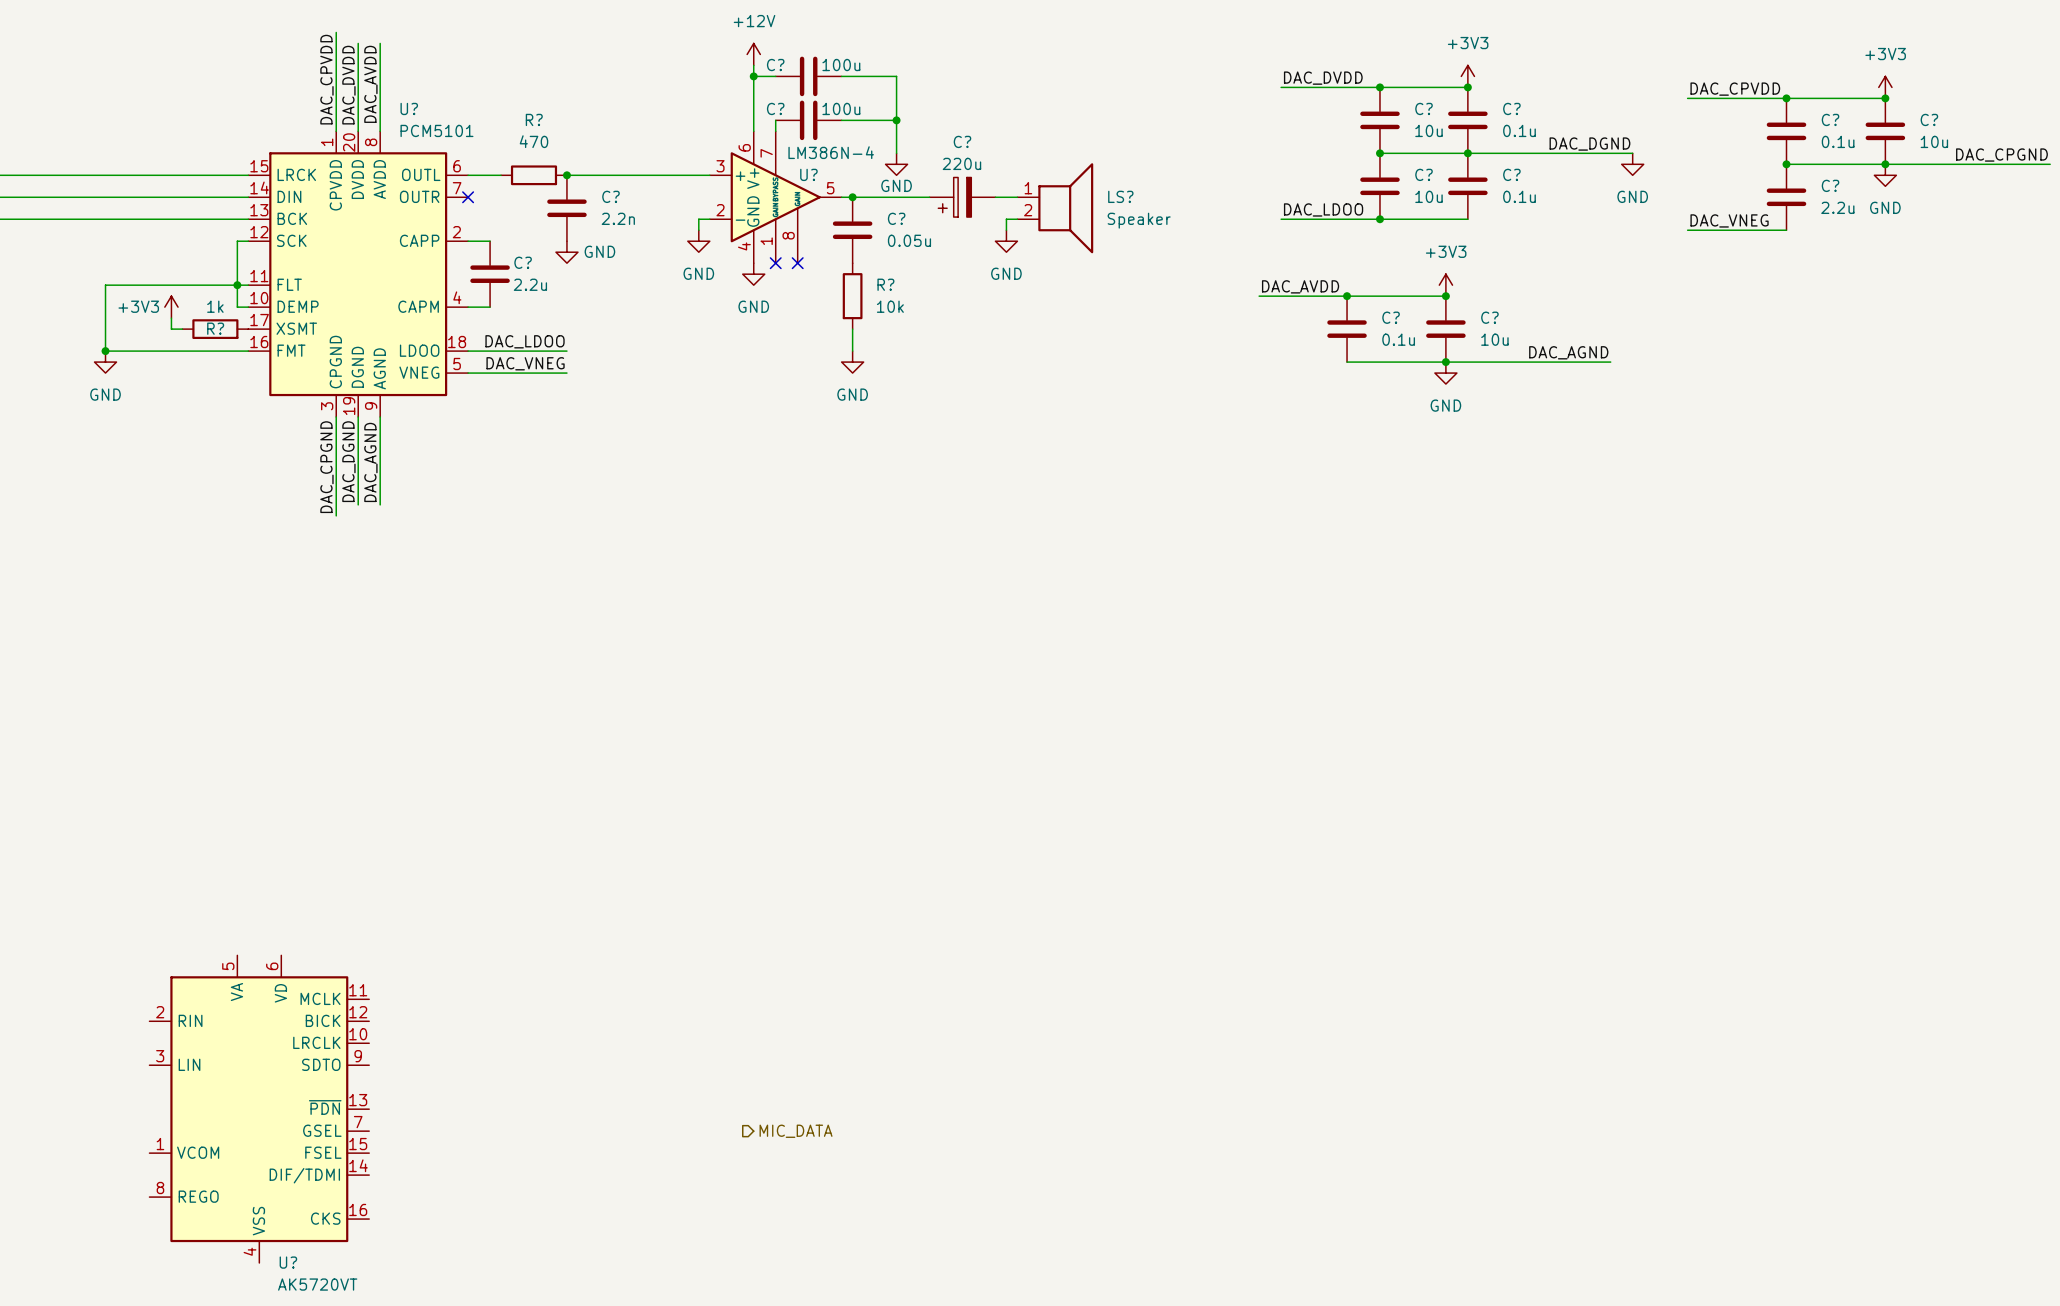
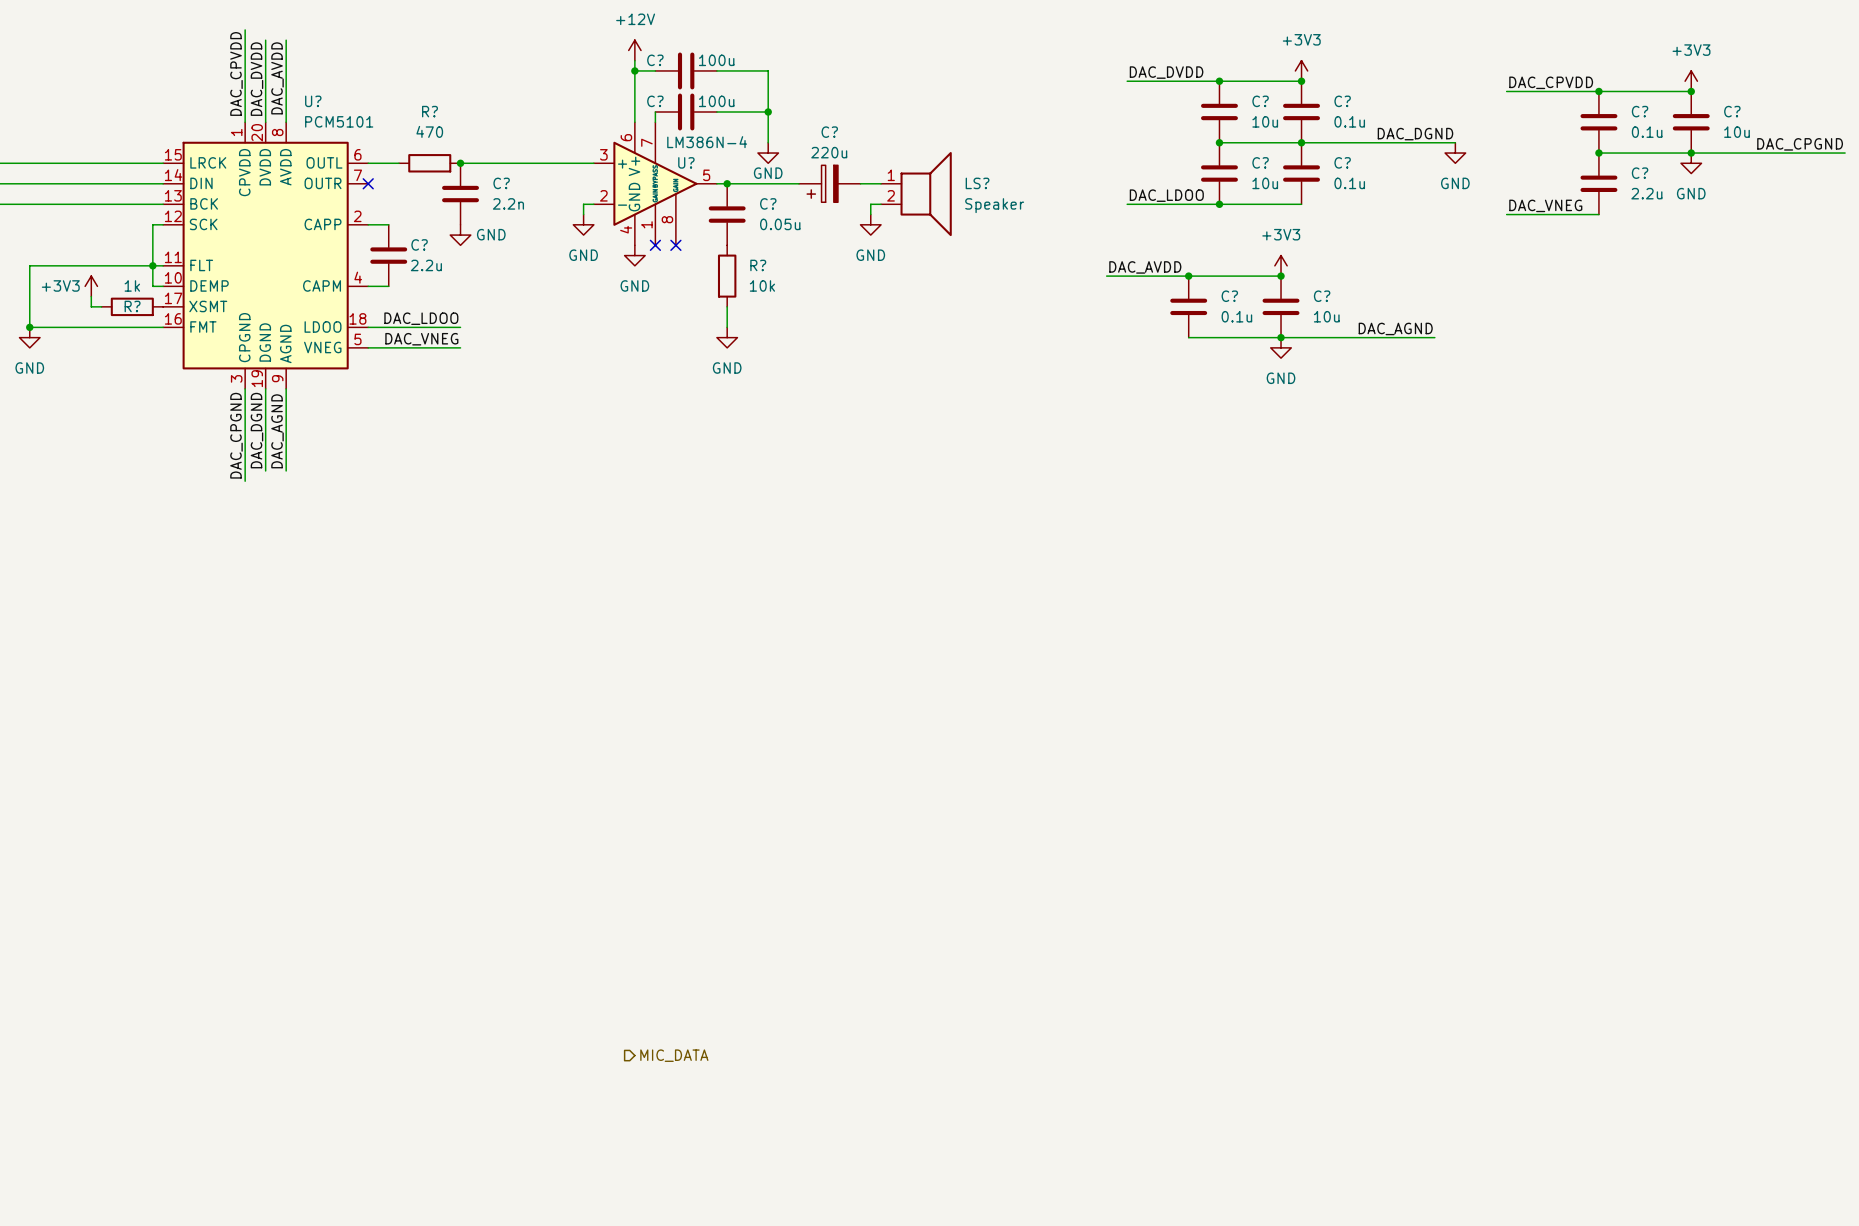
U?: AK5720VT (259, 1109) -> none

